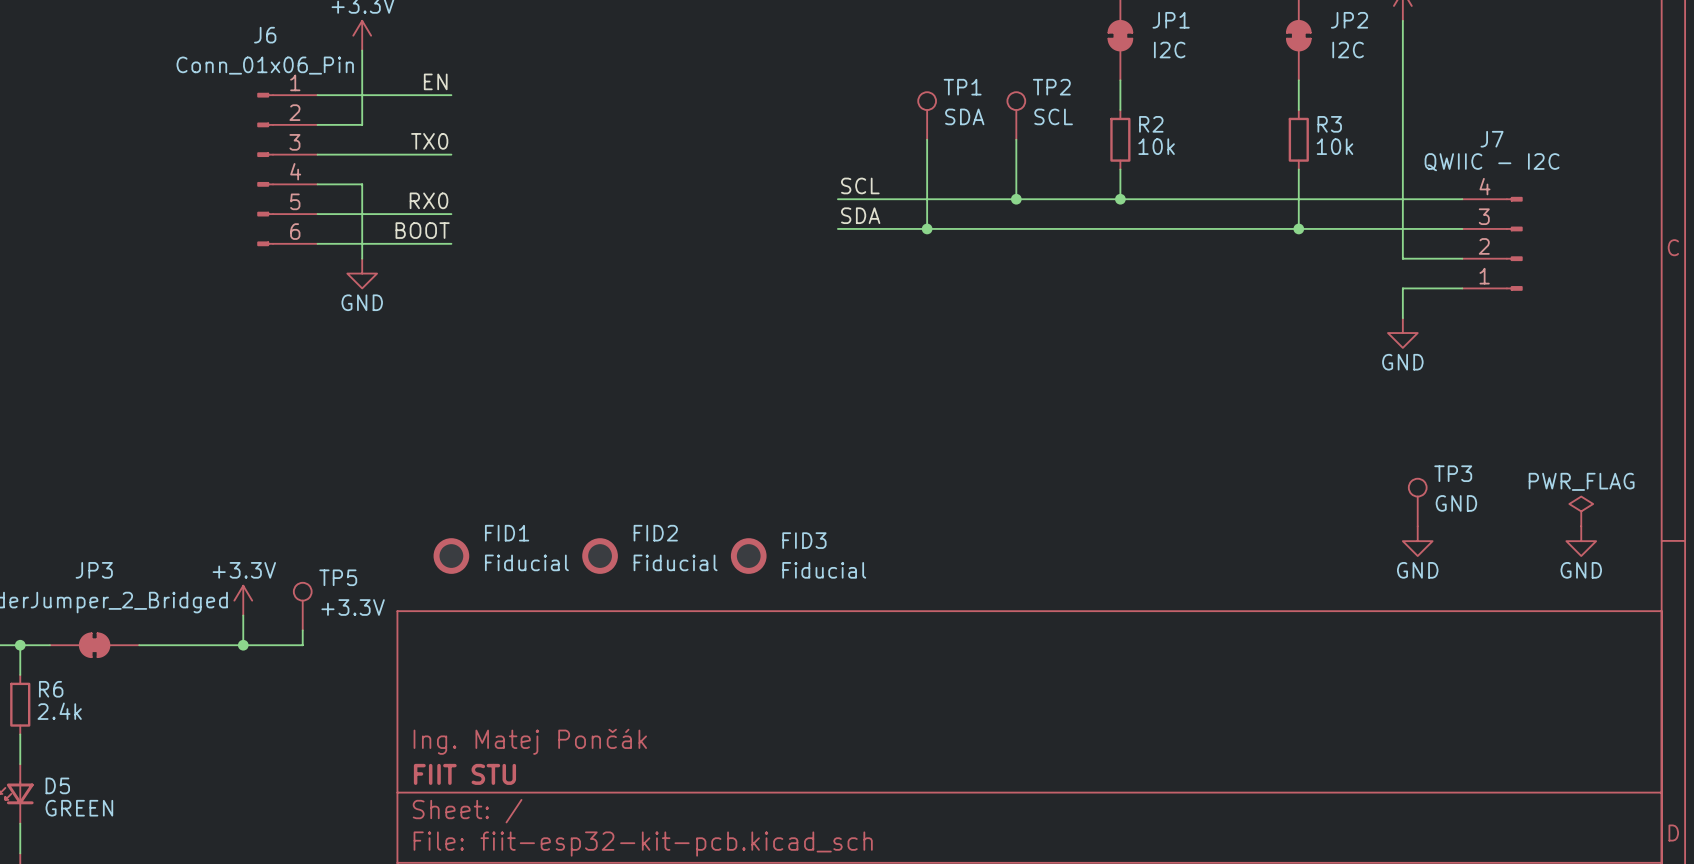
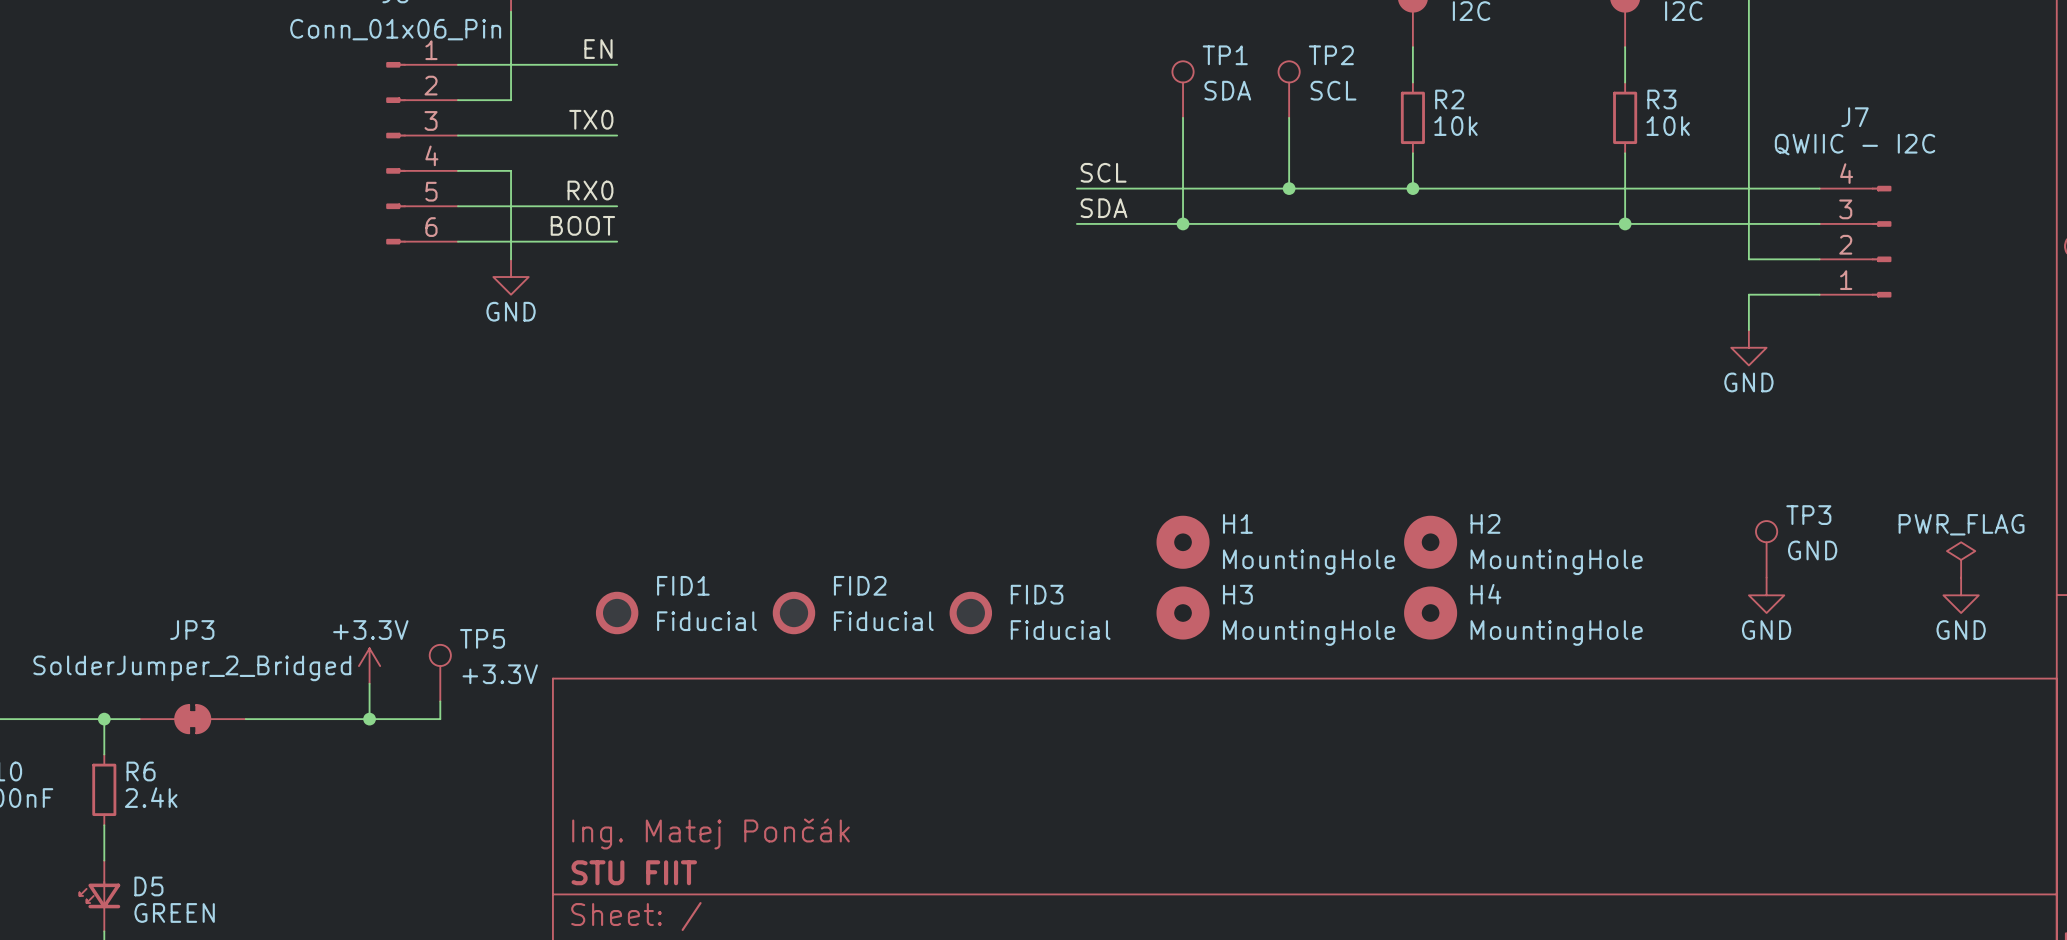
H1: none -> MountingHole (1183, 542)
H2: none -> MountingHole (1430, 542)
H3: none -> MountingHole (1183, 613)
H4: none -> MountingHole (1430, 613)
title block: FIIT STU (464, 774) -> STU FIIT (634, 872)

